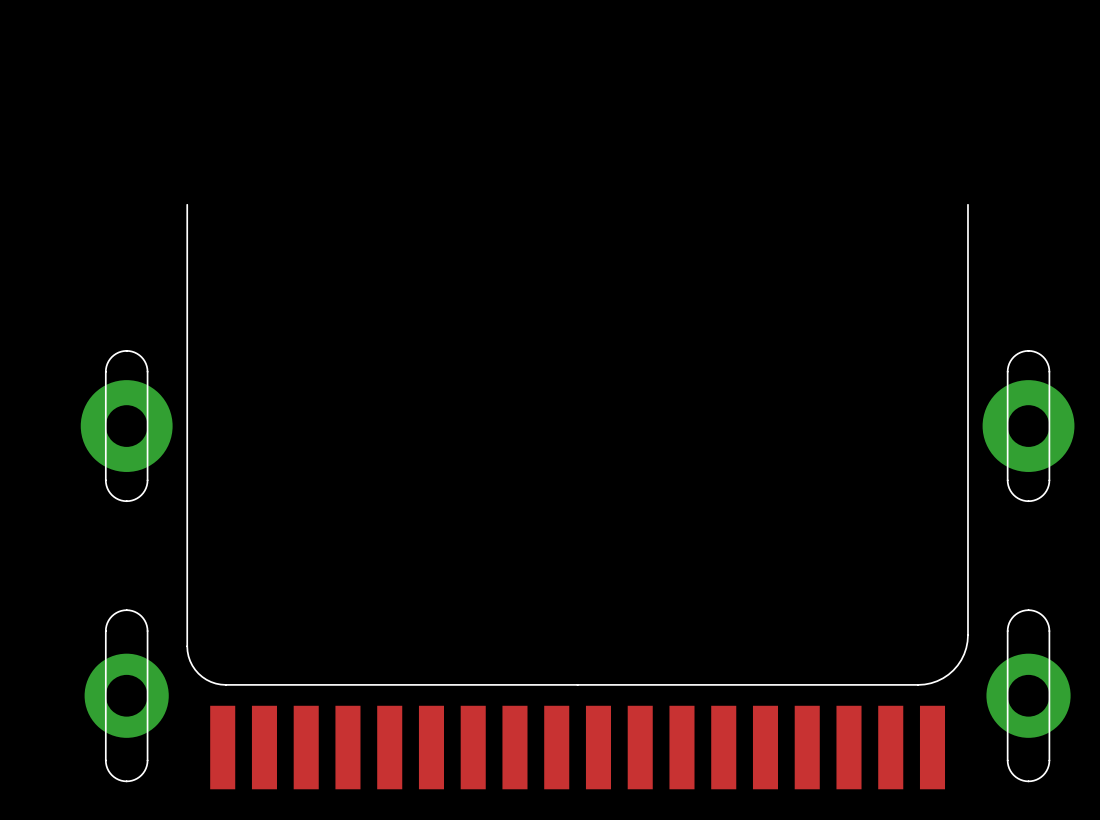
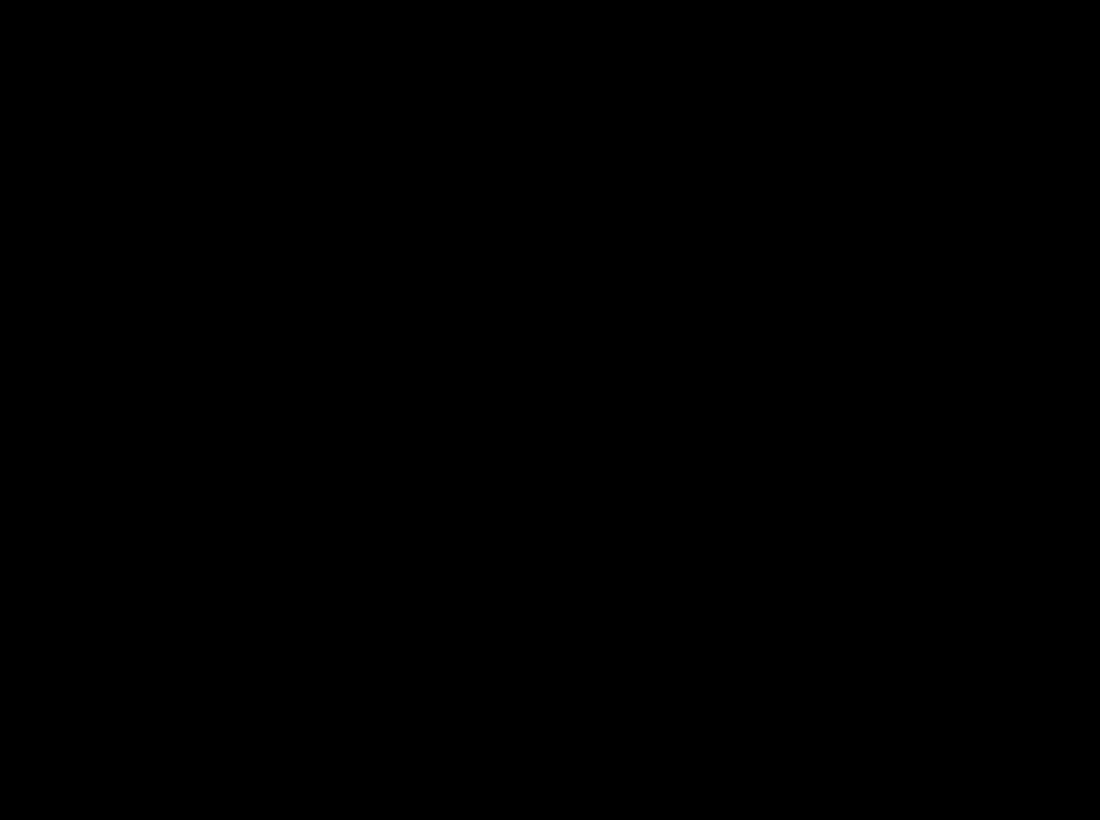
part: (577, 497) -> none

